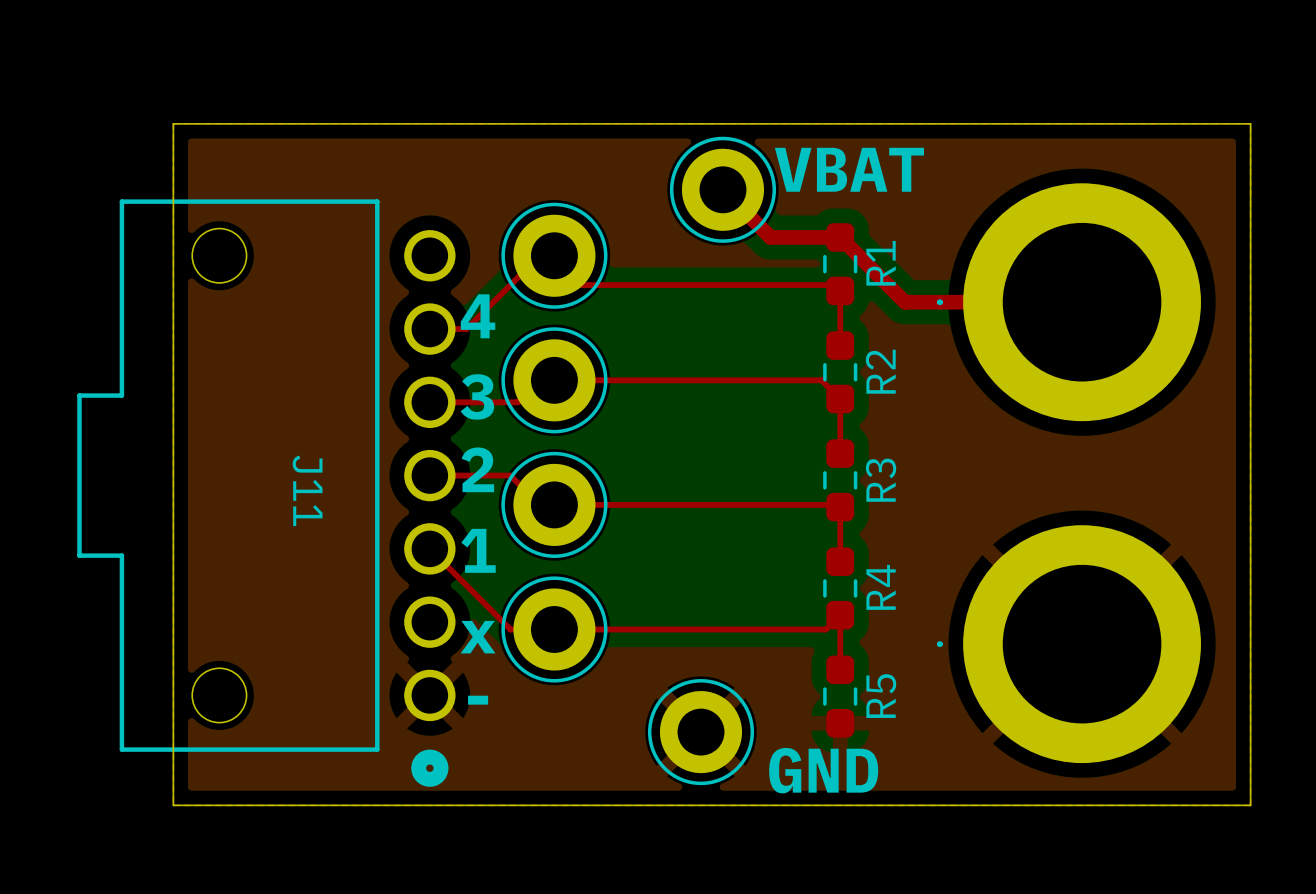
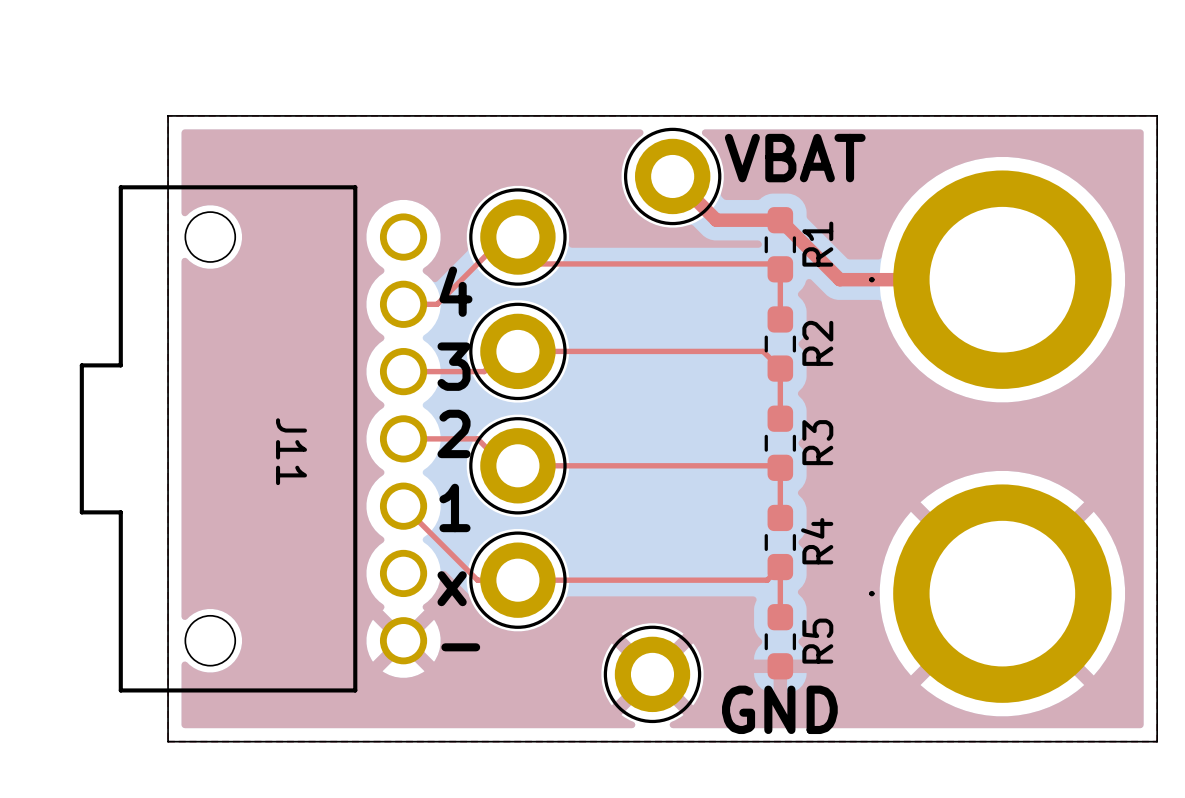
J11 footprint: [77, 199, 456, 787] -> [79, 185, 428, 693]

